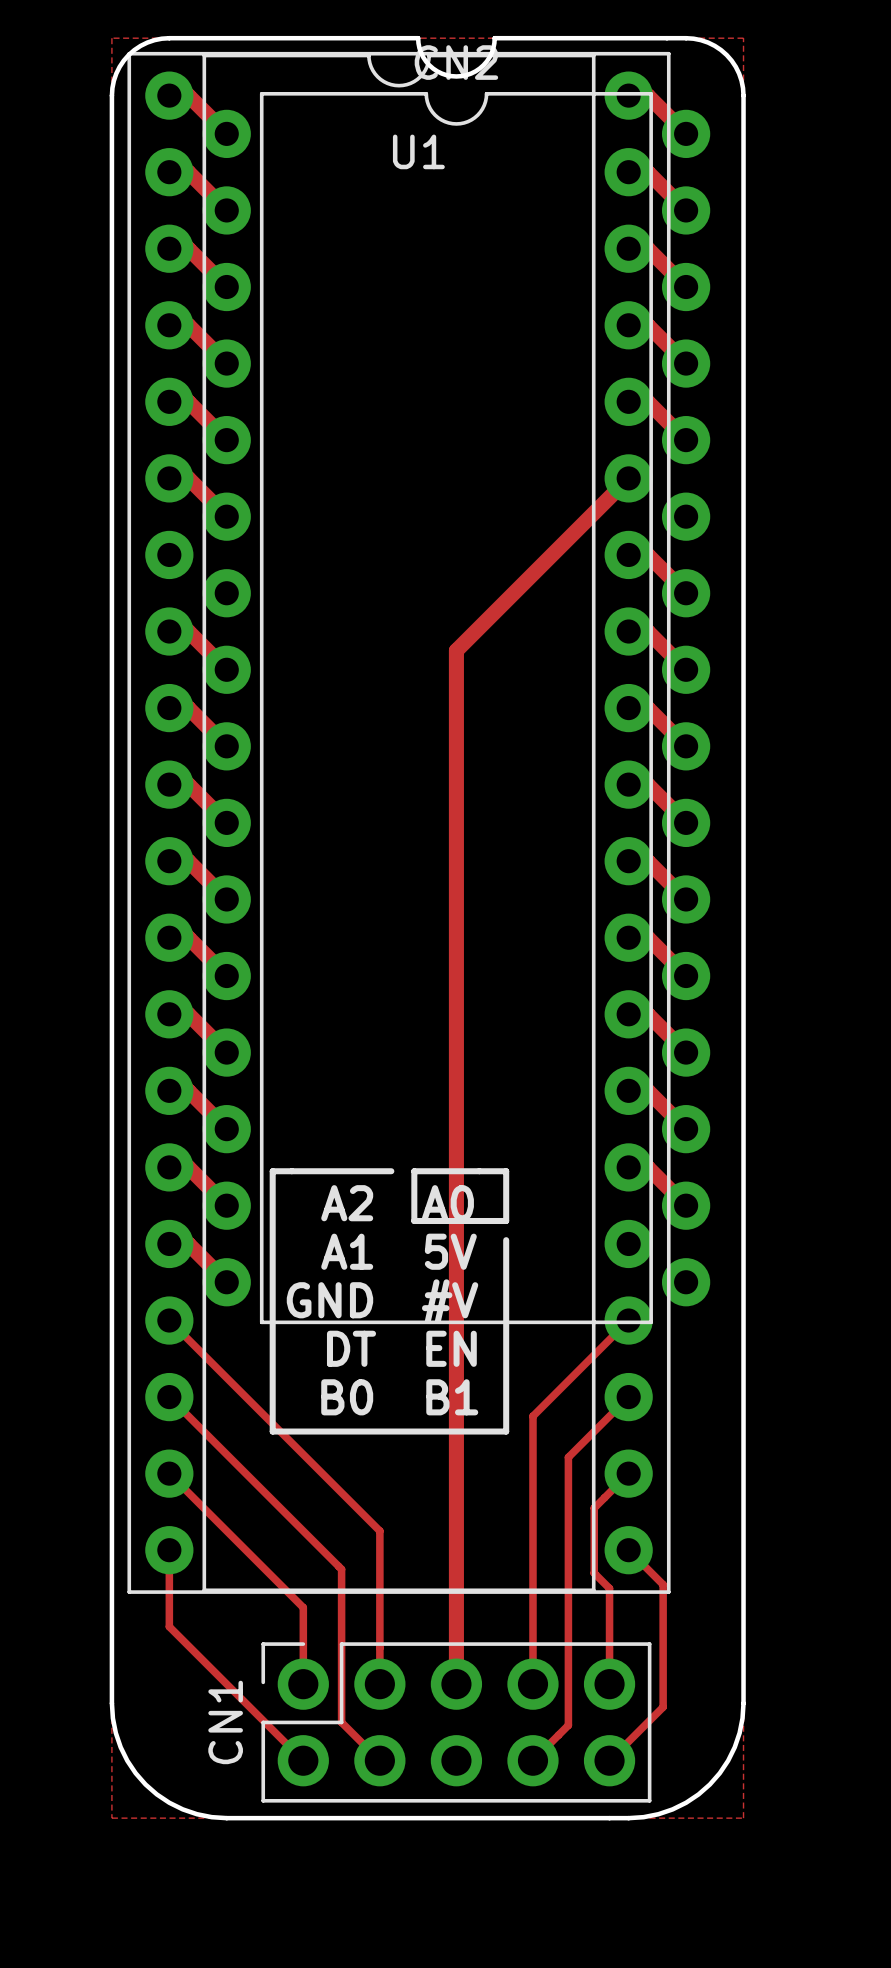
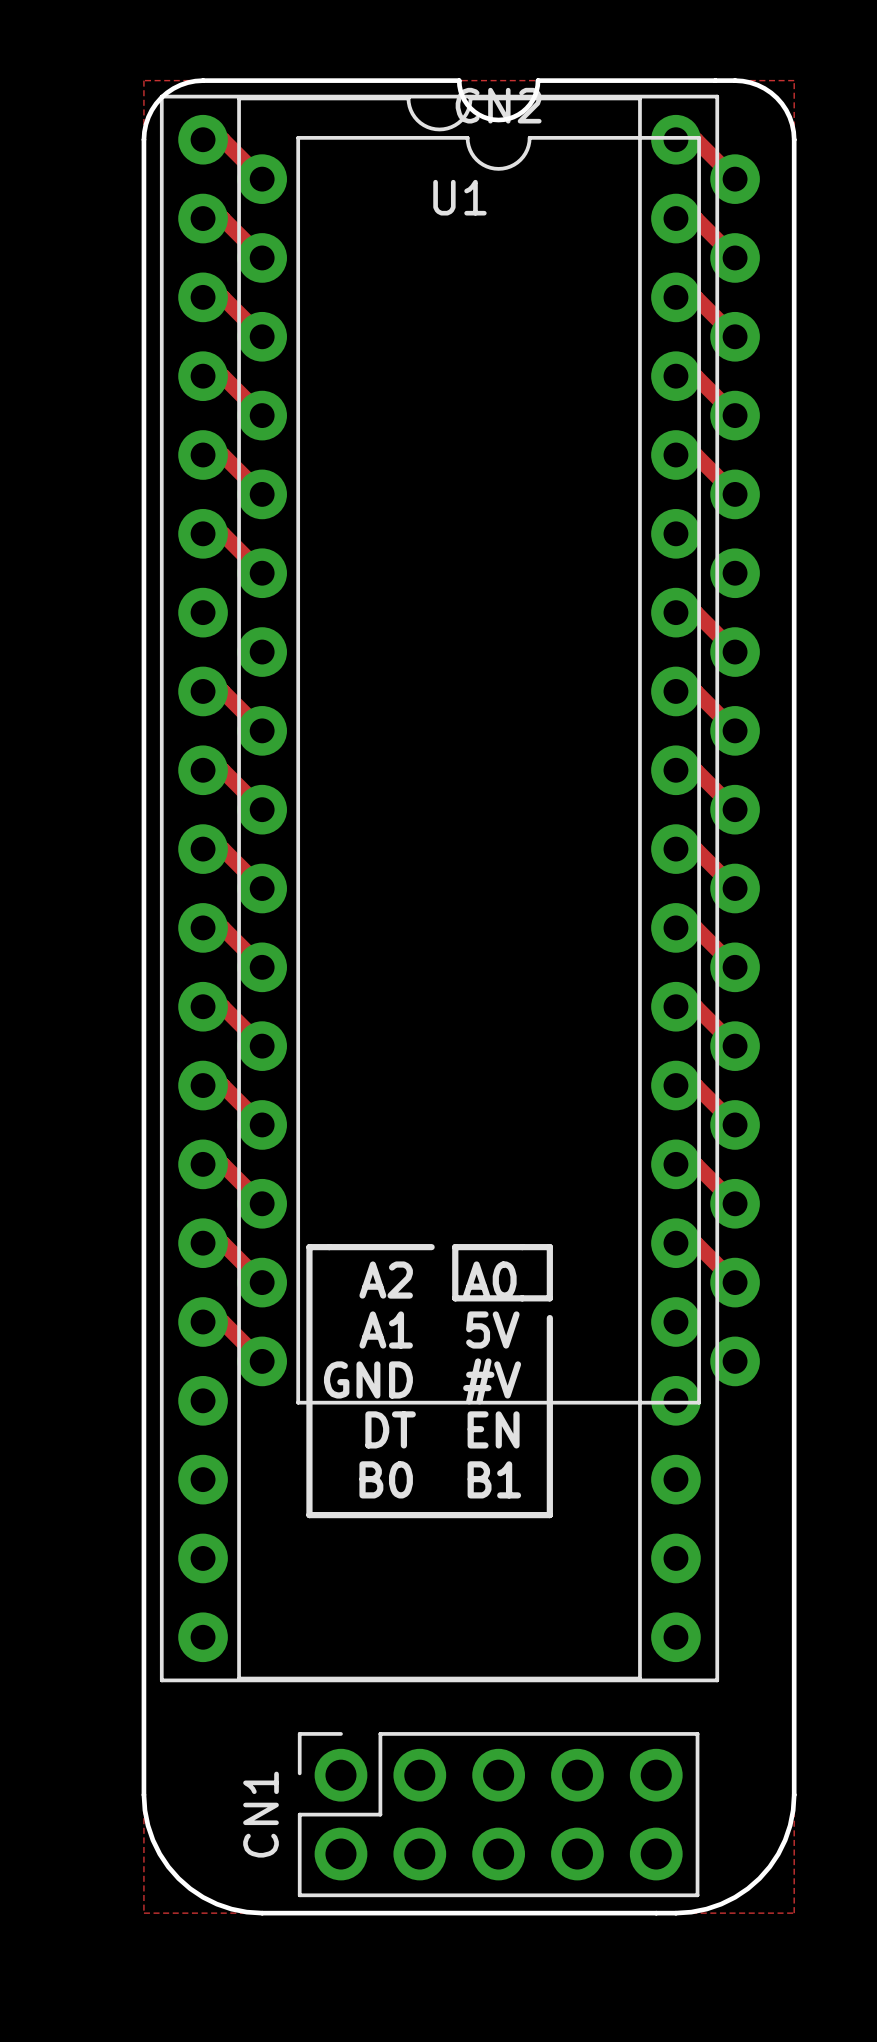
track: (628, 478) (456, 650) (456, 1684) -> none
track: (169, 1320) (379, 1531) (379, 1684) -> none
track: (628, 1320) (532, 1416) (532, 1684) -> none
track: (169, 1397) (341, 1569) (341, 1722) (379, 1760) -> none
track: (628, 1397) (568, 1457) (568, 1725) (532, 1760) -> none
track: (169, 1473) (303, 1607) (303, 1684) -> none
track: (628, 1473) (594, 1508) (594, 1573) (609, 1588) (609, 1684) -> none
track: (169, 1550) (169, 1626) (303, 1760) -> none
track: (628, 1550) (663, 1584) (663, 1707) (609, 1760) -> none

